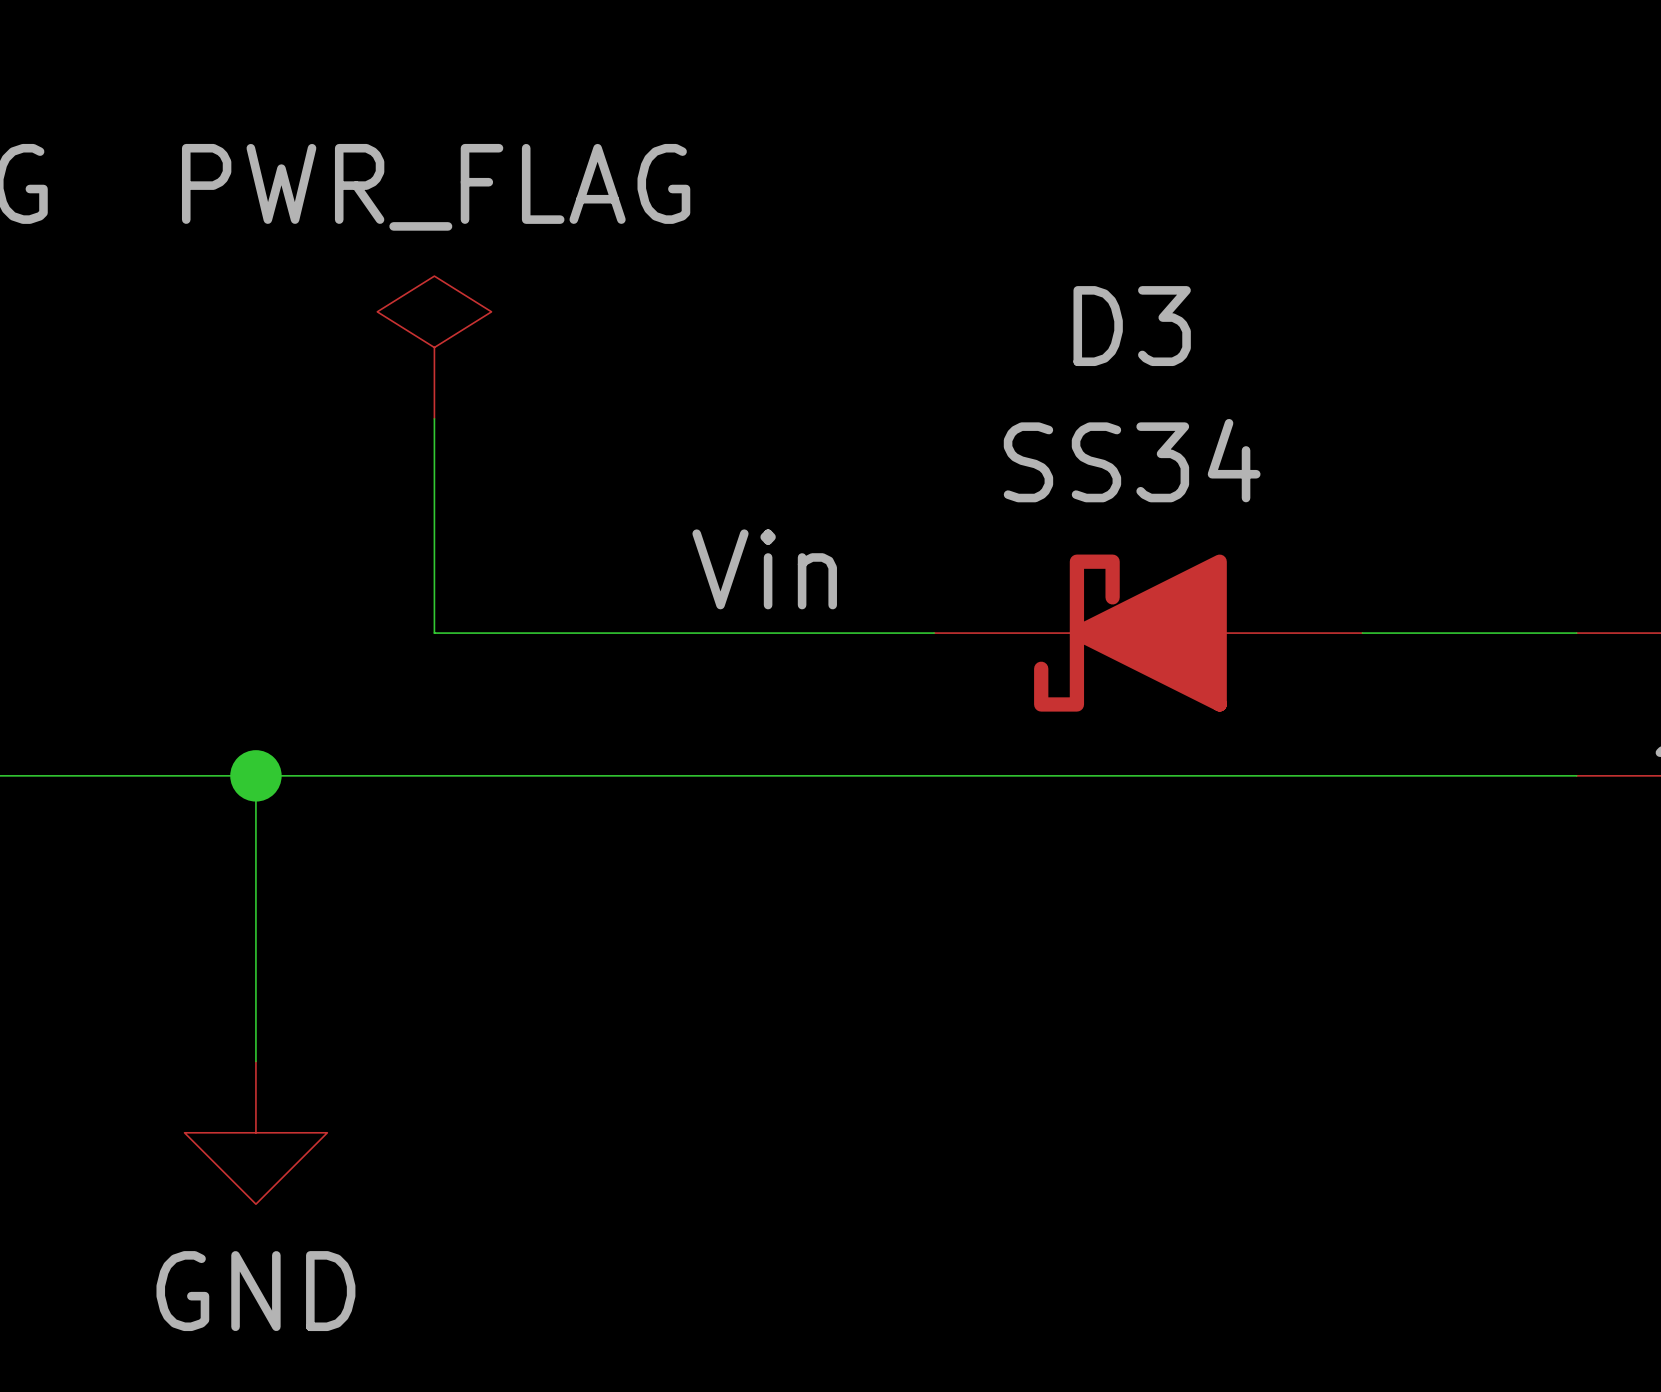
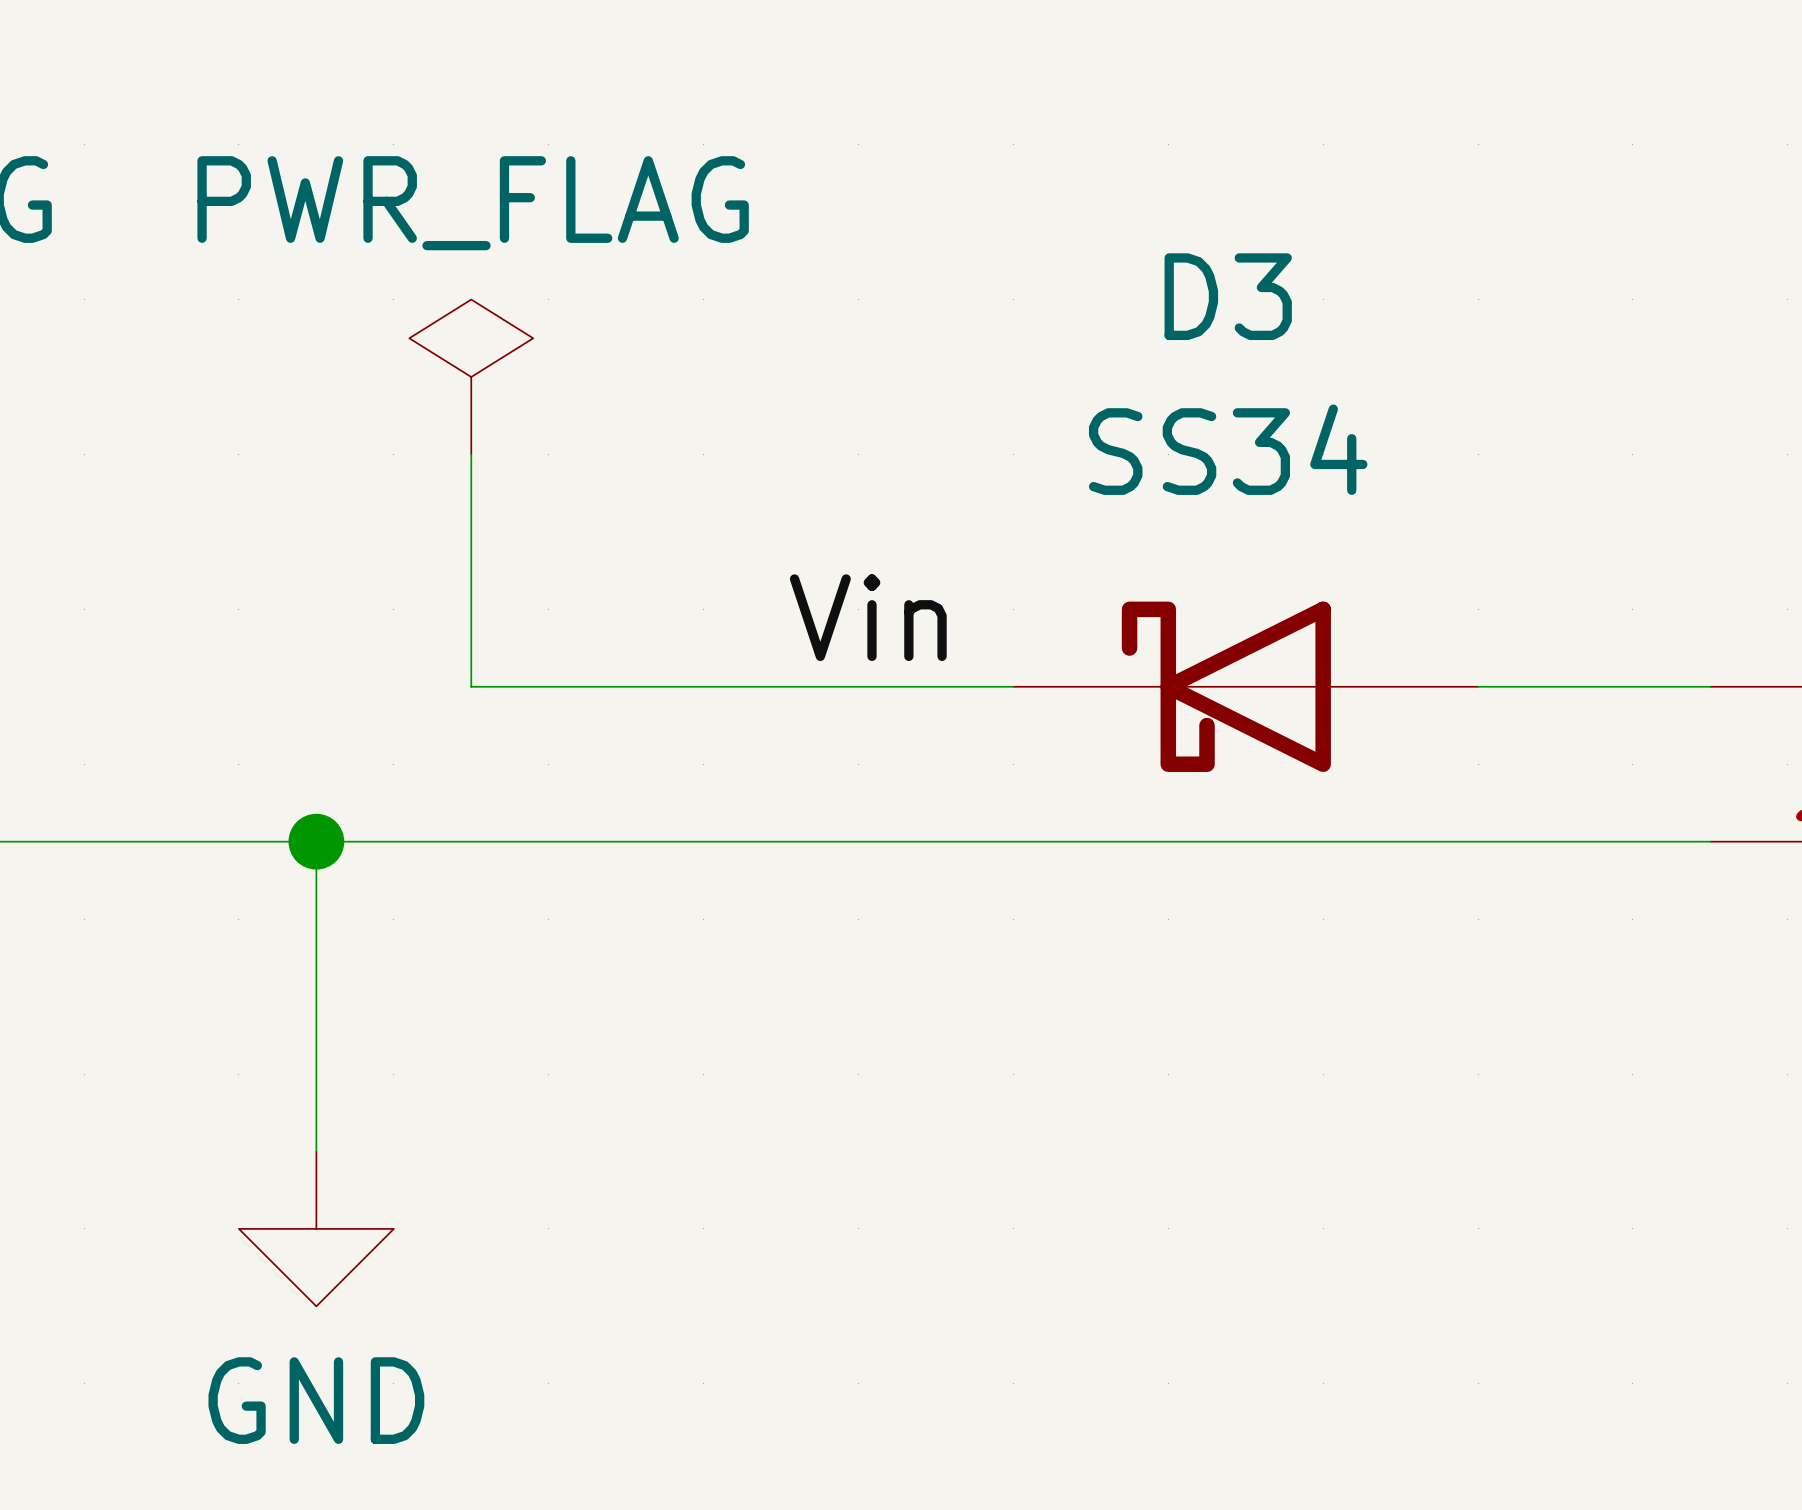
D3 name position: D3 (1132, 326) -> D3 (1228, 296)
D3 value position: SS34 (1132, 460) -> SS34 (1228, 449)
D3 symbol: [934, 554, 1363, 712] -> [1013, 601, 1479, 772]
label position: Vin (764, 569) -> Vin (868, 617)
wire: (255, 775) (255, 1061) -> (316, 841) (316, 1151)
junction position: (255, 775) -> (316, 841)
power symbol position: GND (255, 1132) -> GND (316, 1228)

